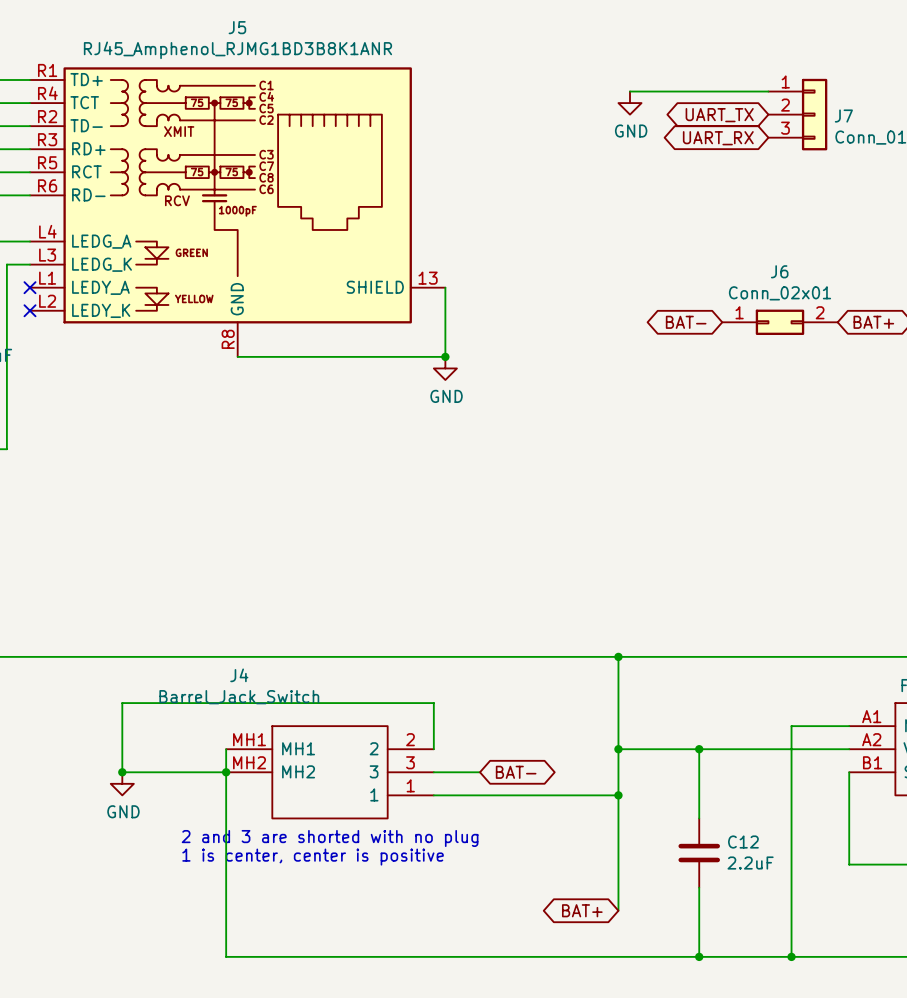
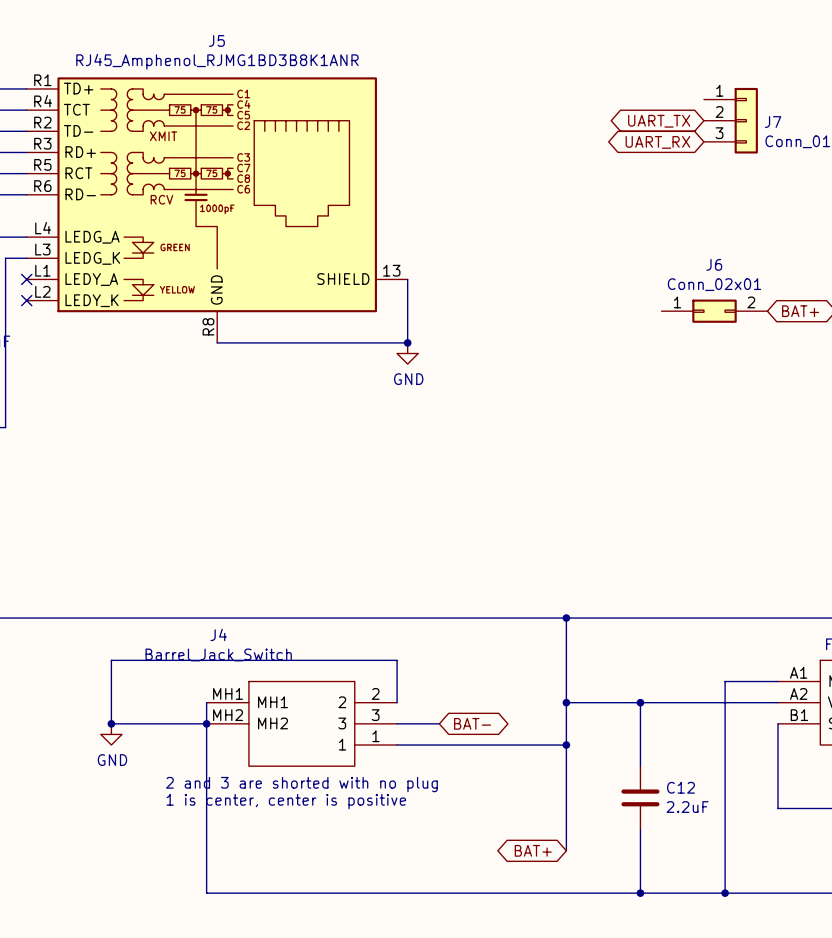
wire: (629, 91) (768, 91) -> none
power symbol: GND (629, 103) -> none
global label: BAT- (686, 322) -> none

